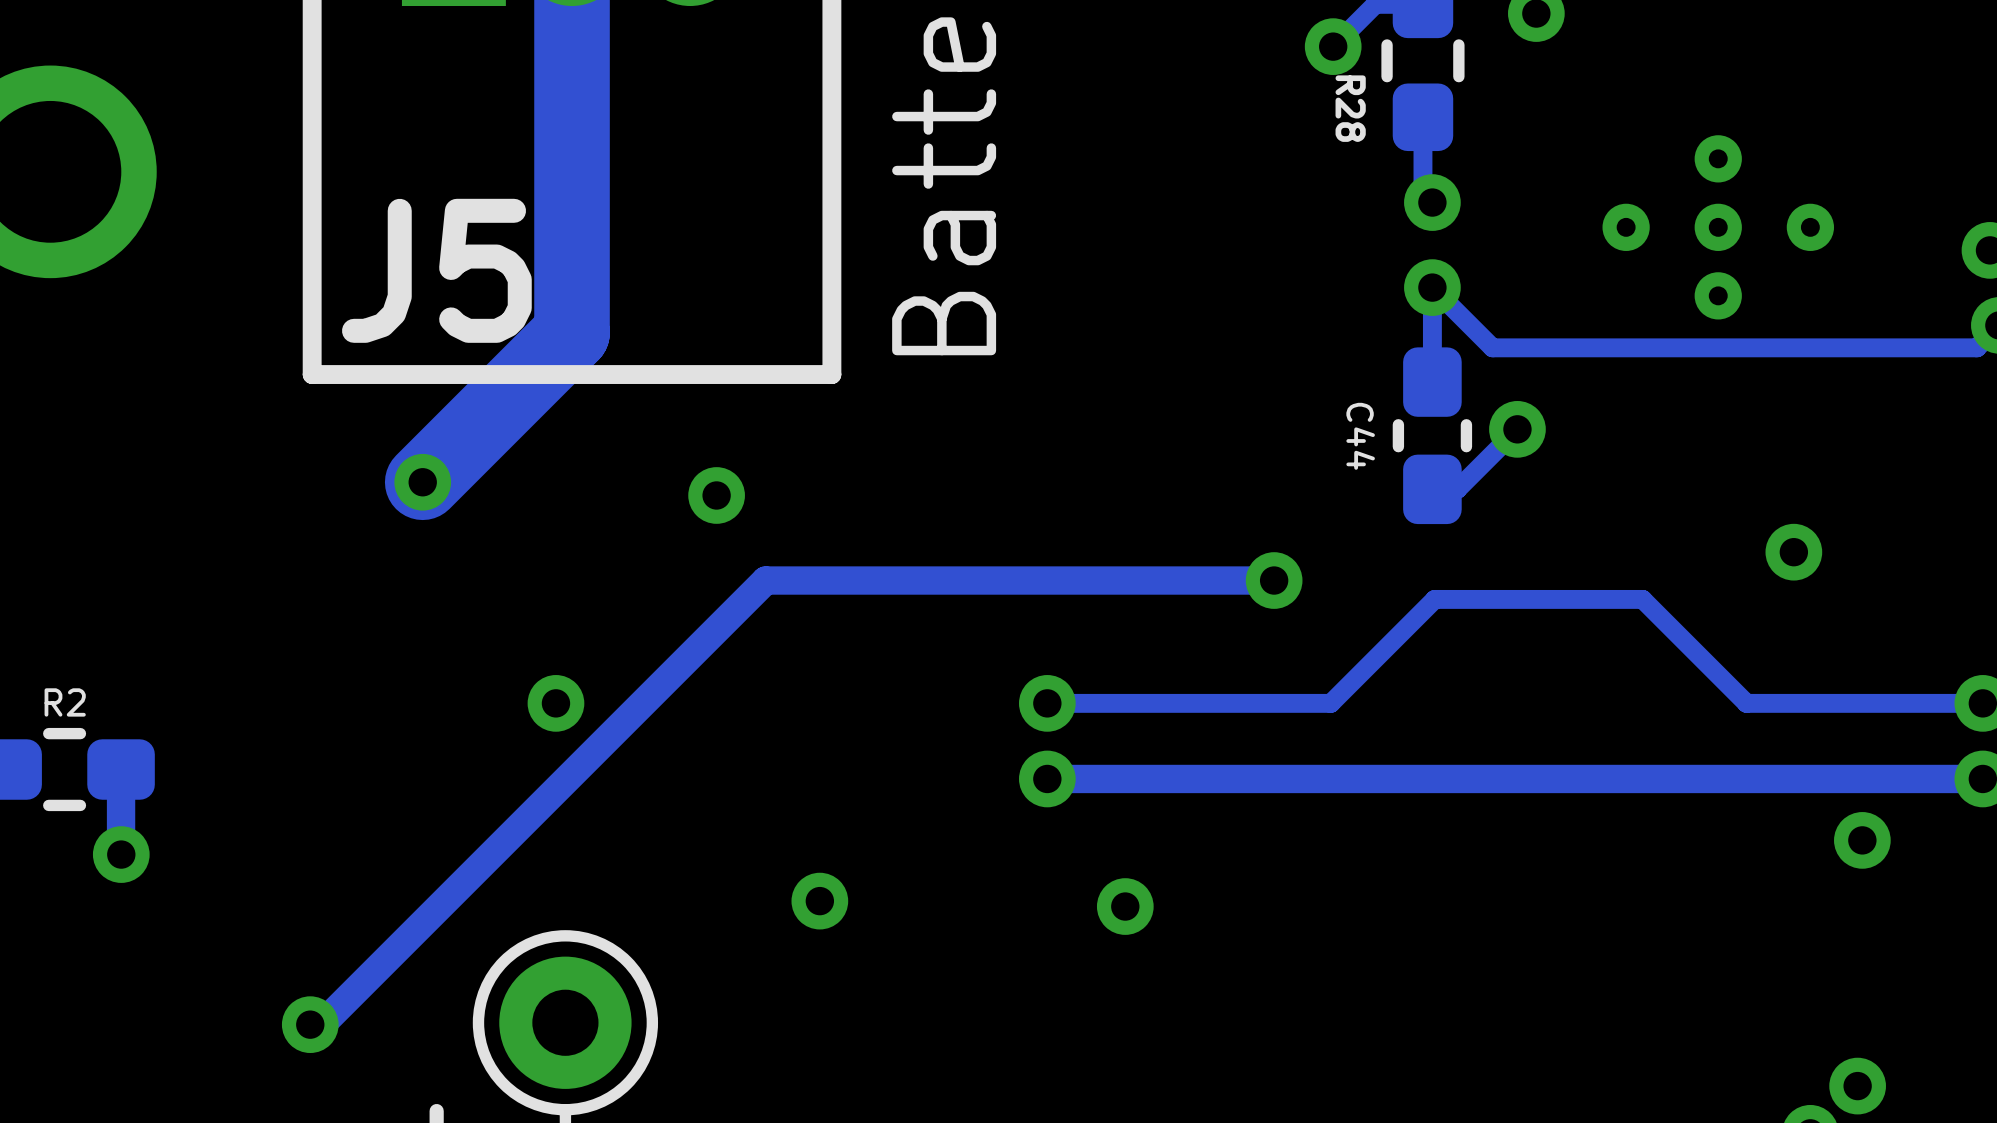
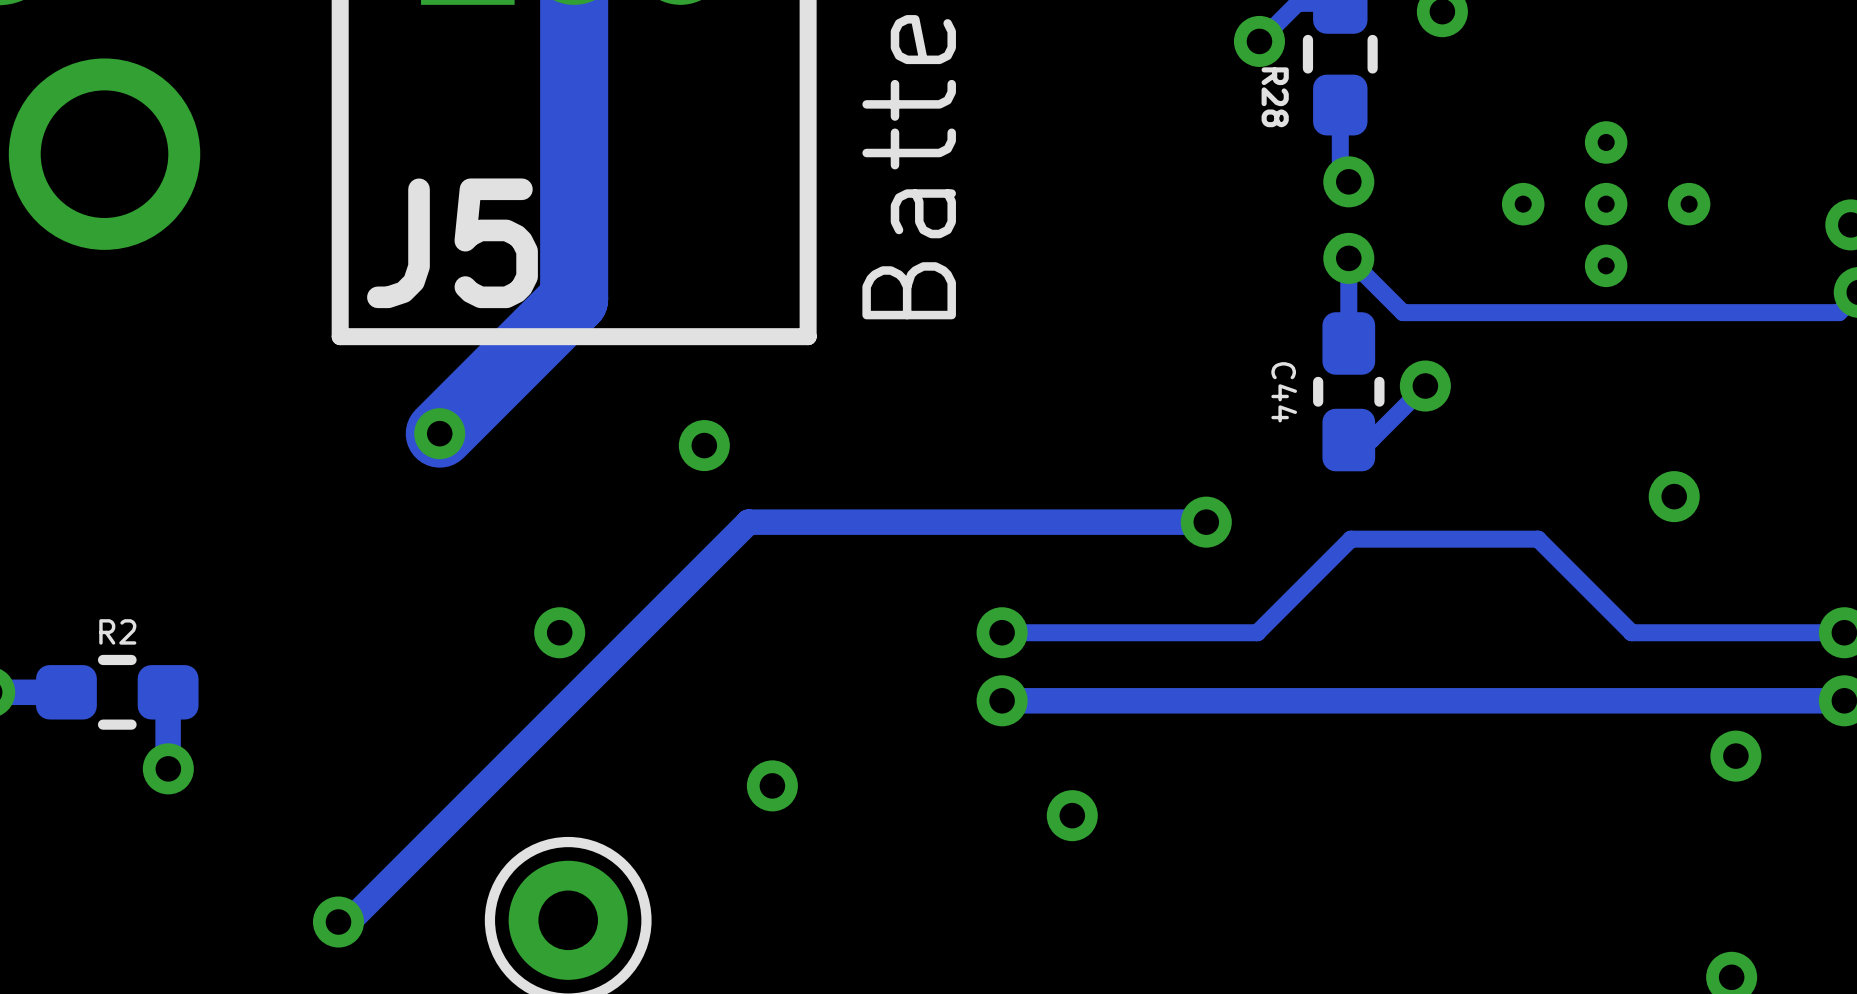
via position: (819, 901) -> (772, 785)

